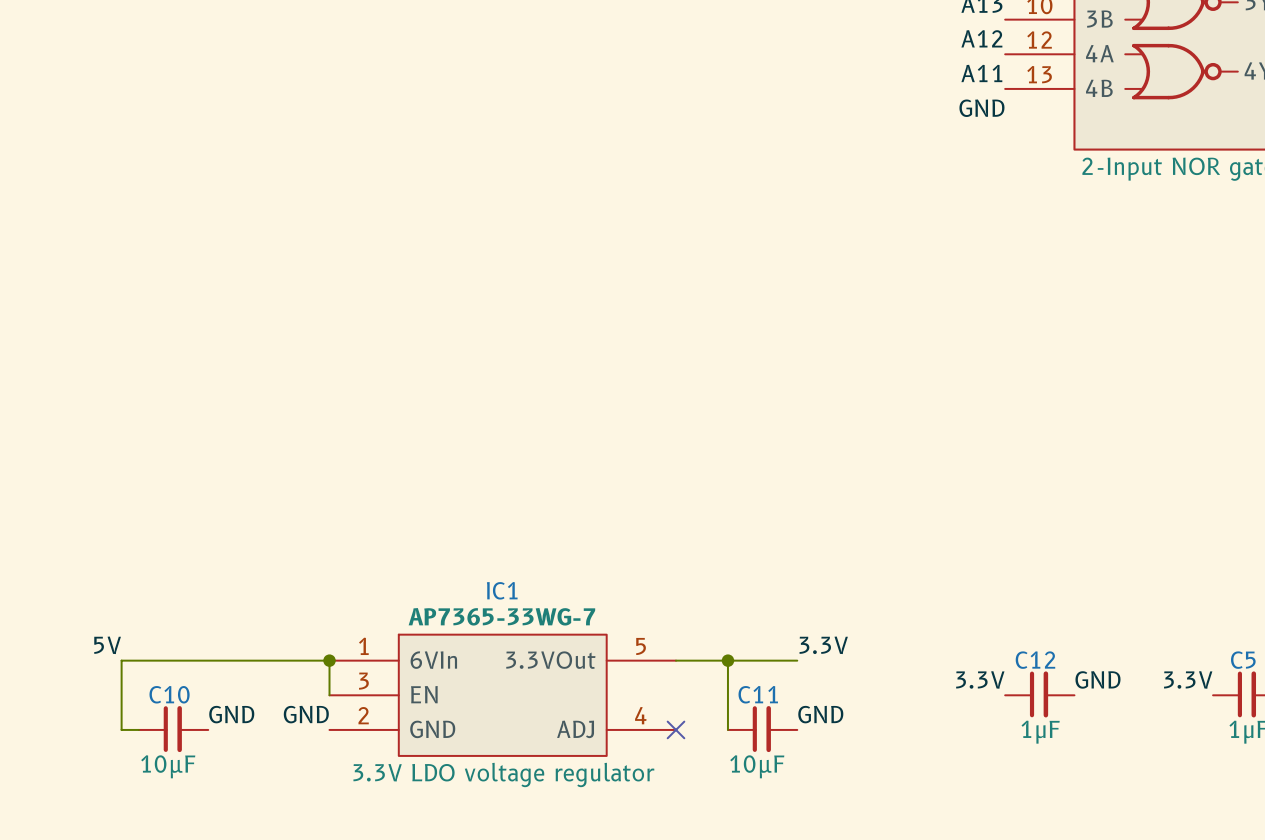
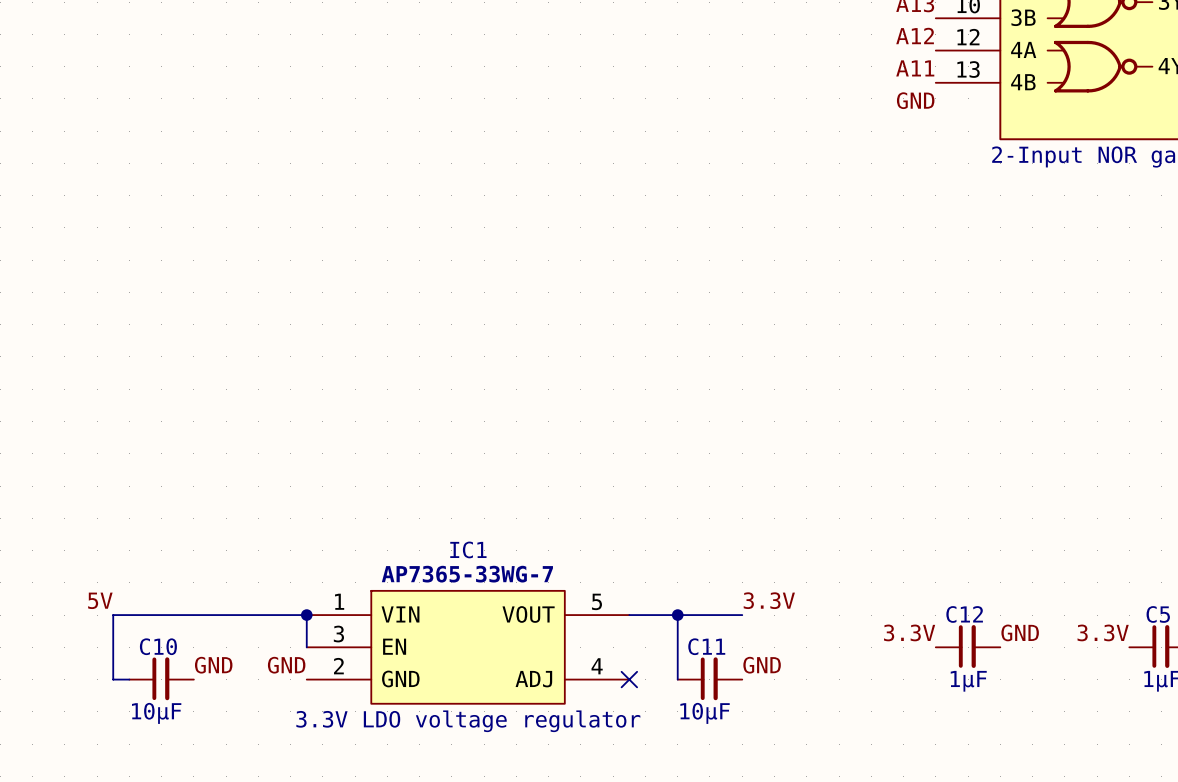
IC1 pin name: 6VIn (433, 660) -> VIN (400, 614)
IC1 pin name: 3.3VOut (550, 660) -> VOUT (528, 614)

